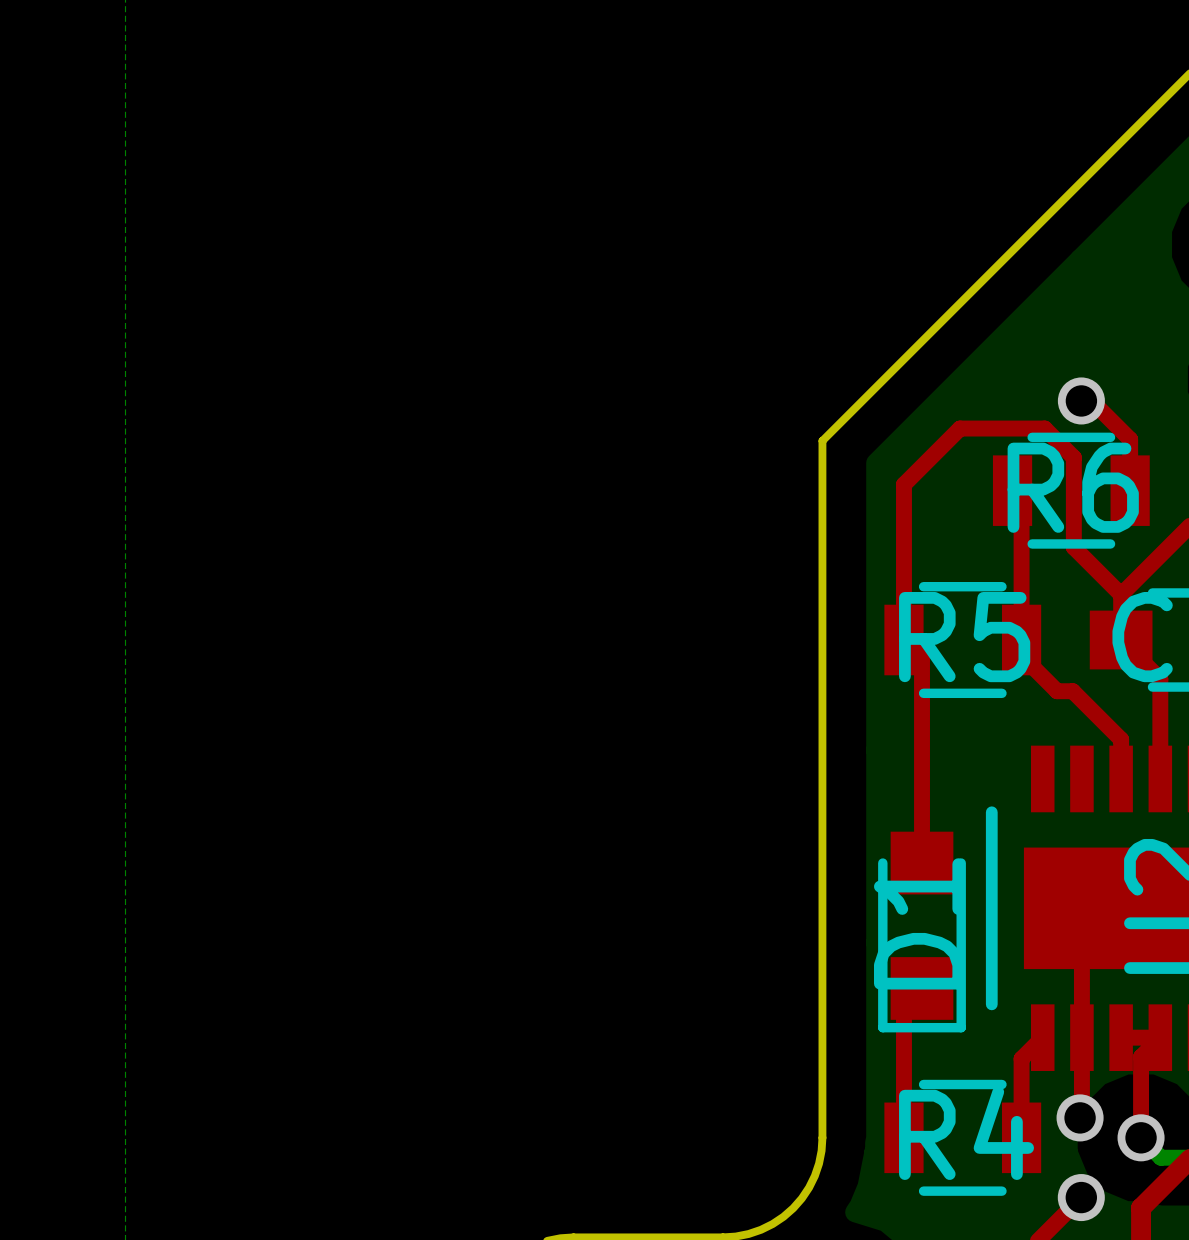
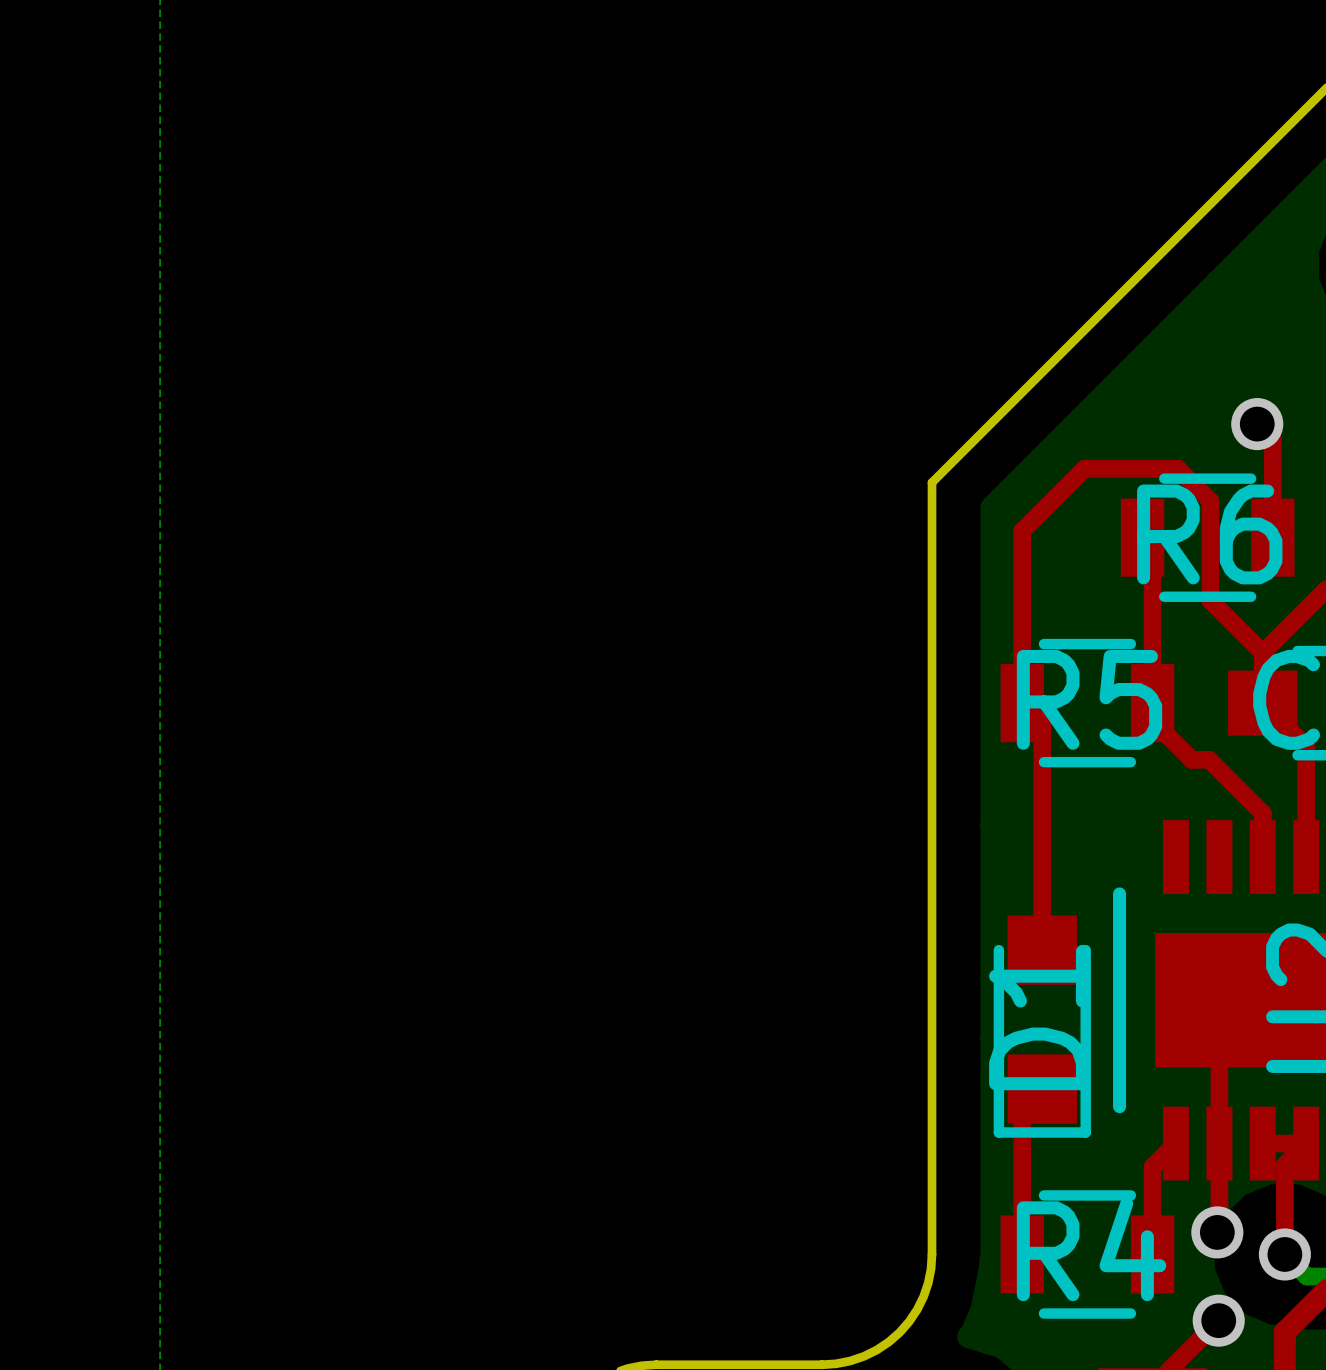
top track: (1081, 400) (1091, 400) (1130, 439) -> (1257, 424) (1272, 439) (1272, 480)
via position: (1081, 400) -> (1257, 424)

